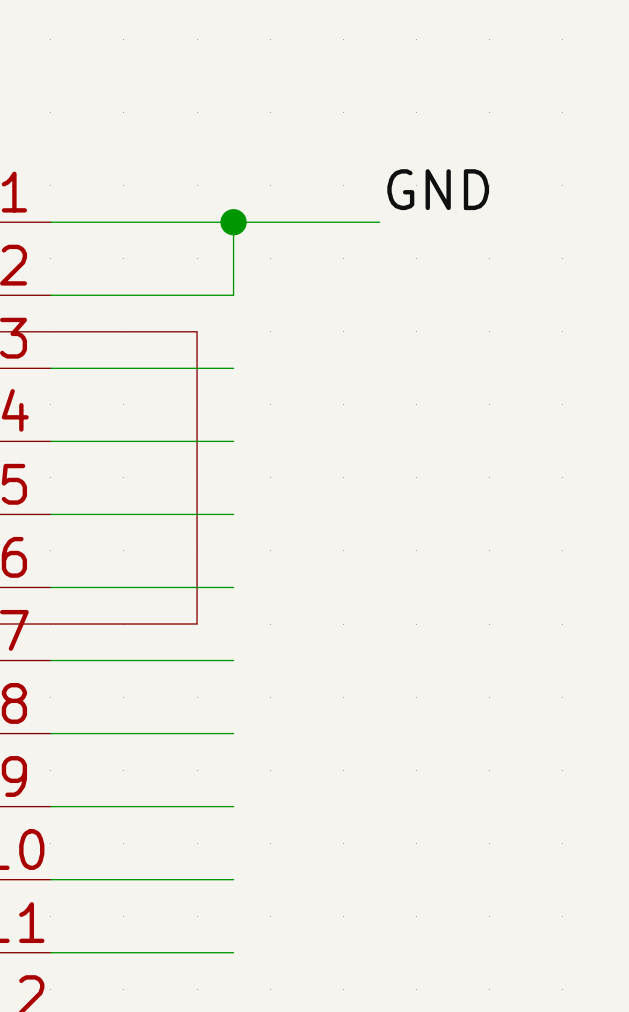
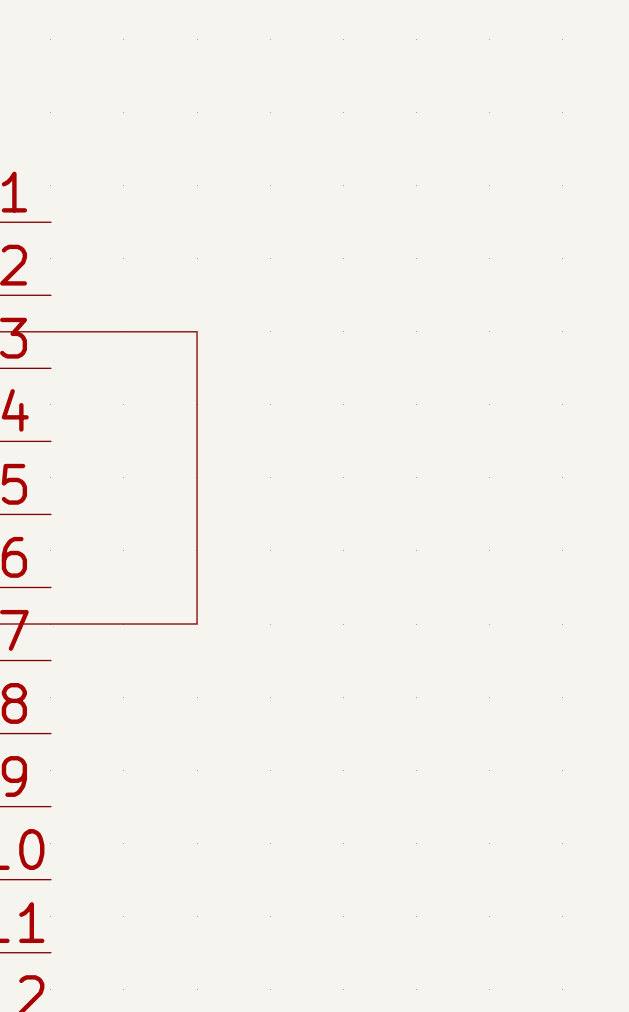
label: GND (438, 189) -> none
wire: (50, 222) (379, 222) -> none
wire: (233, 222) (233, 295) (50, 295) -> none
junction: (233, 222) -> none
wire: (50, 368) (233, 368) -> none
wire: (50, 441) (233, 441) -> none
wire: (50, 514) (233, 514) -> none
wire: (50, 587) (233, 587) -> none
wire: (50, 660) (233, 660) -> none
wire: (50, 733) (233, 733) -> none
wire: (50, 806) (233, 806) -> none
wire: (50, 879) (233, 879) -> none
wire: (50, 952) (233, 952) -> none

